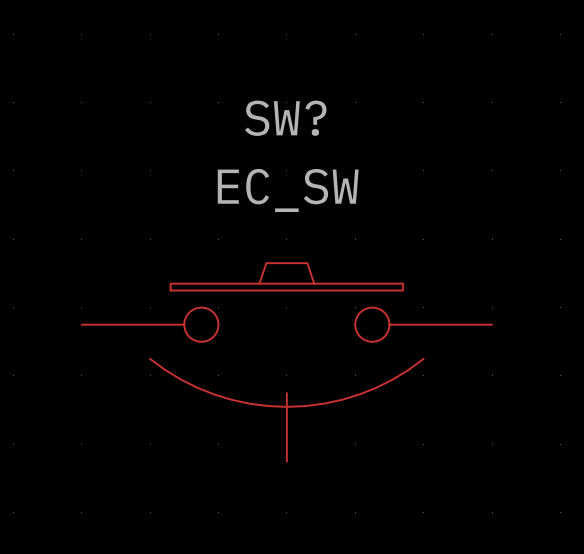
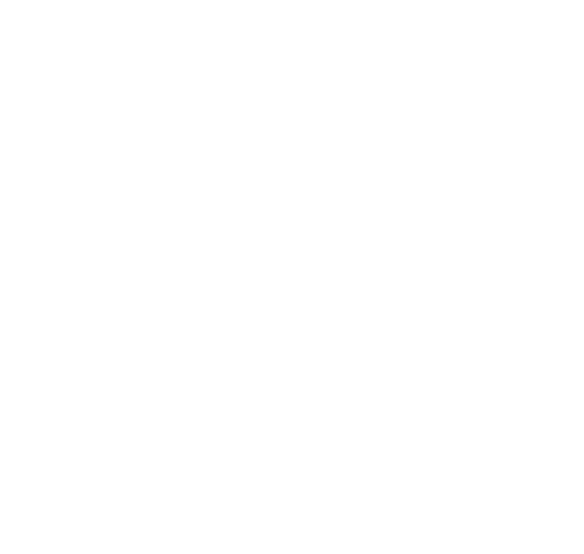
SW?: EC_SW (286, 362) -> none

